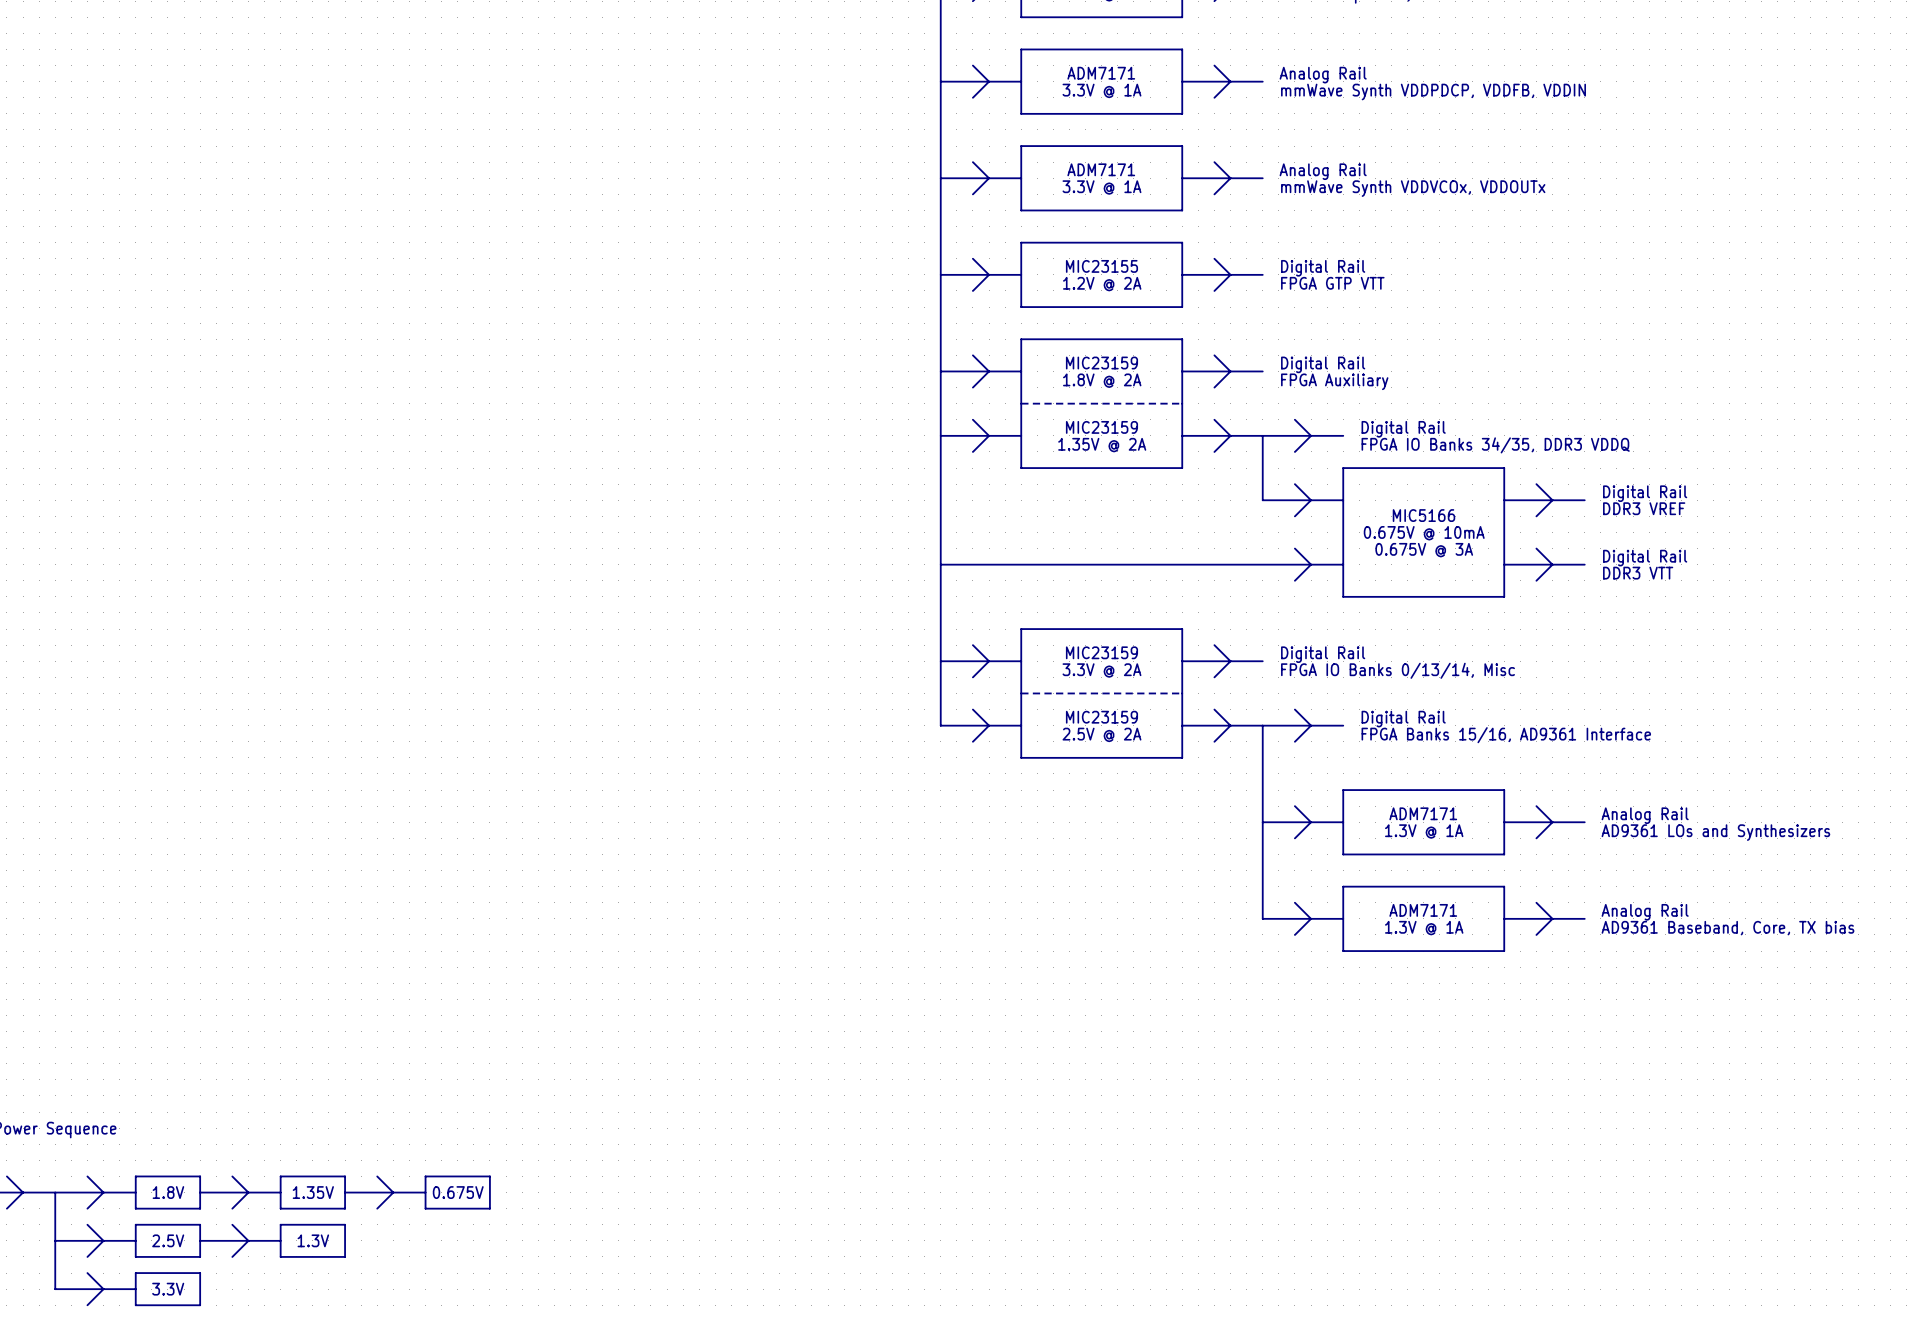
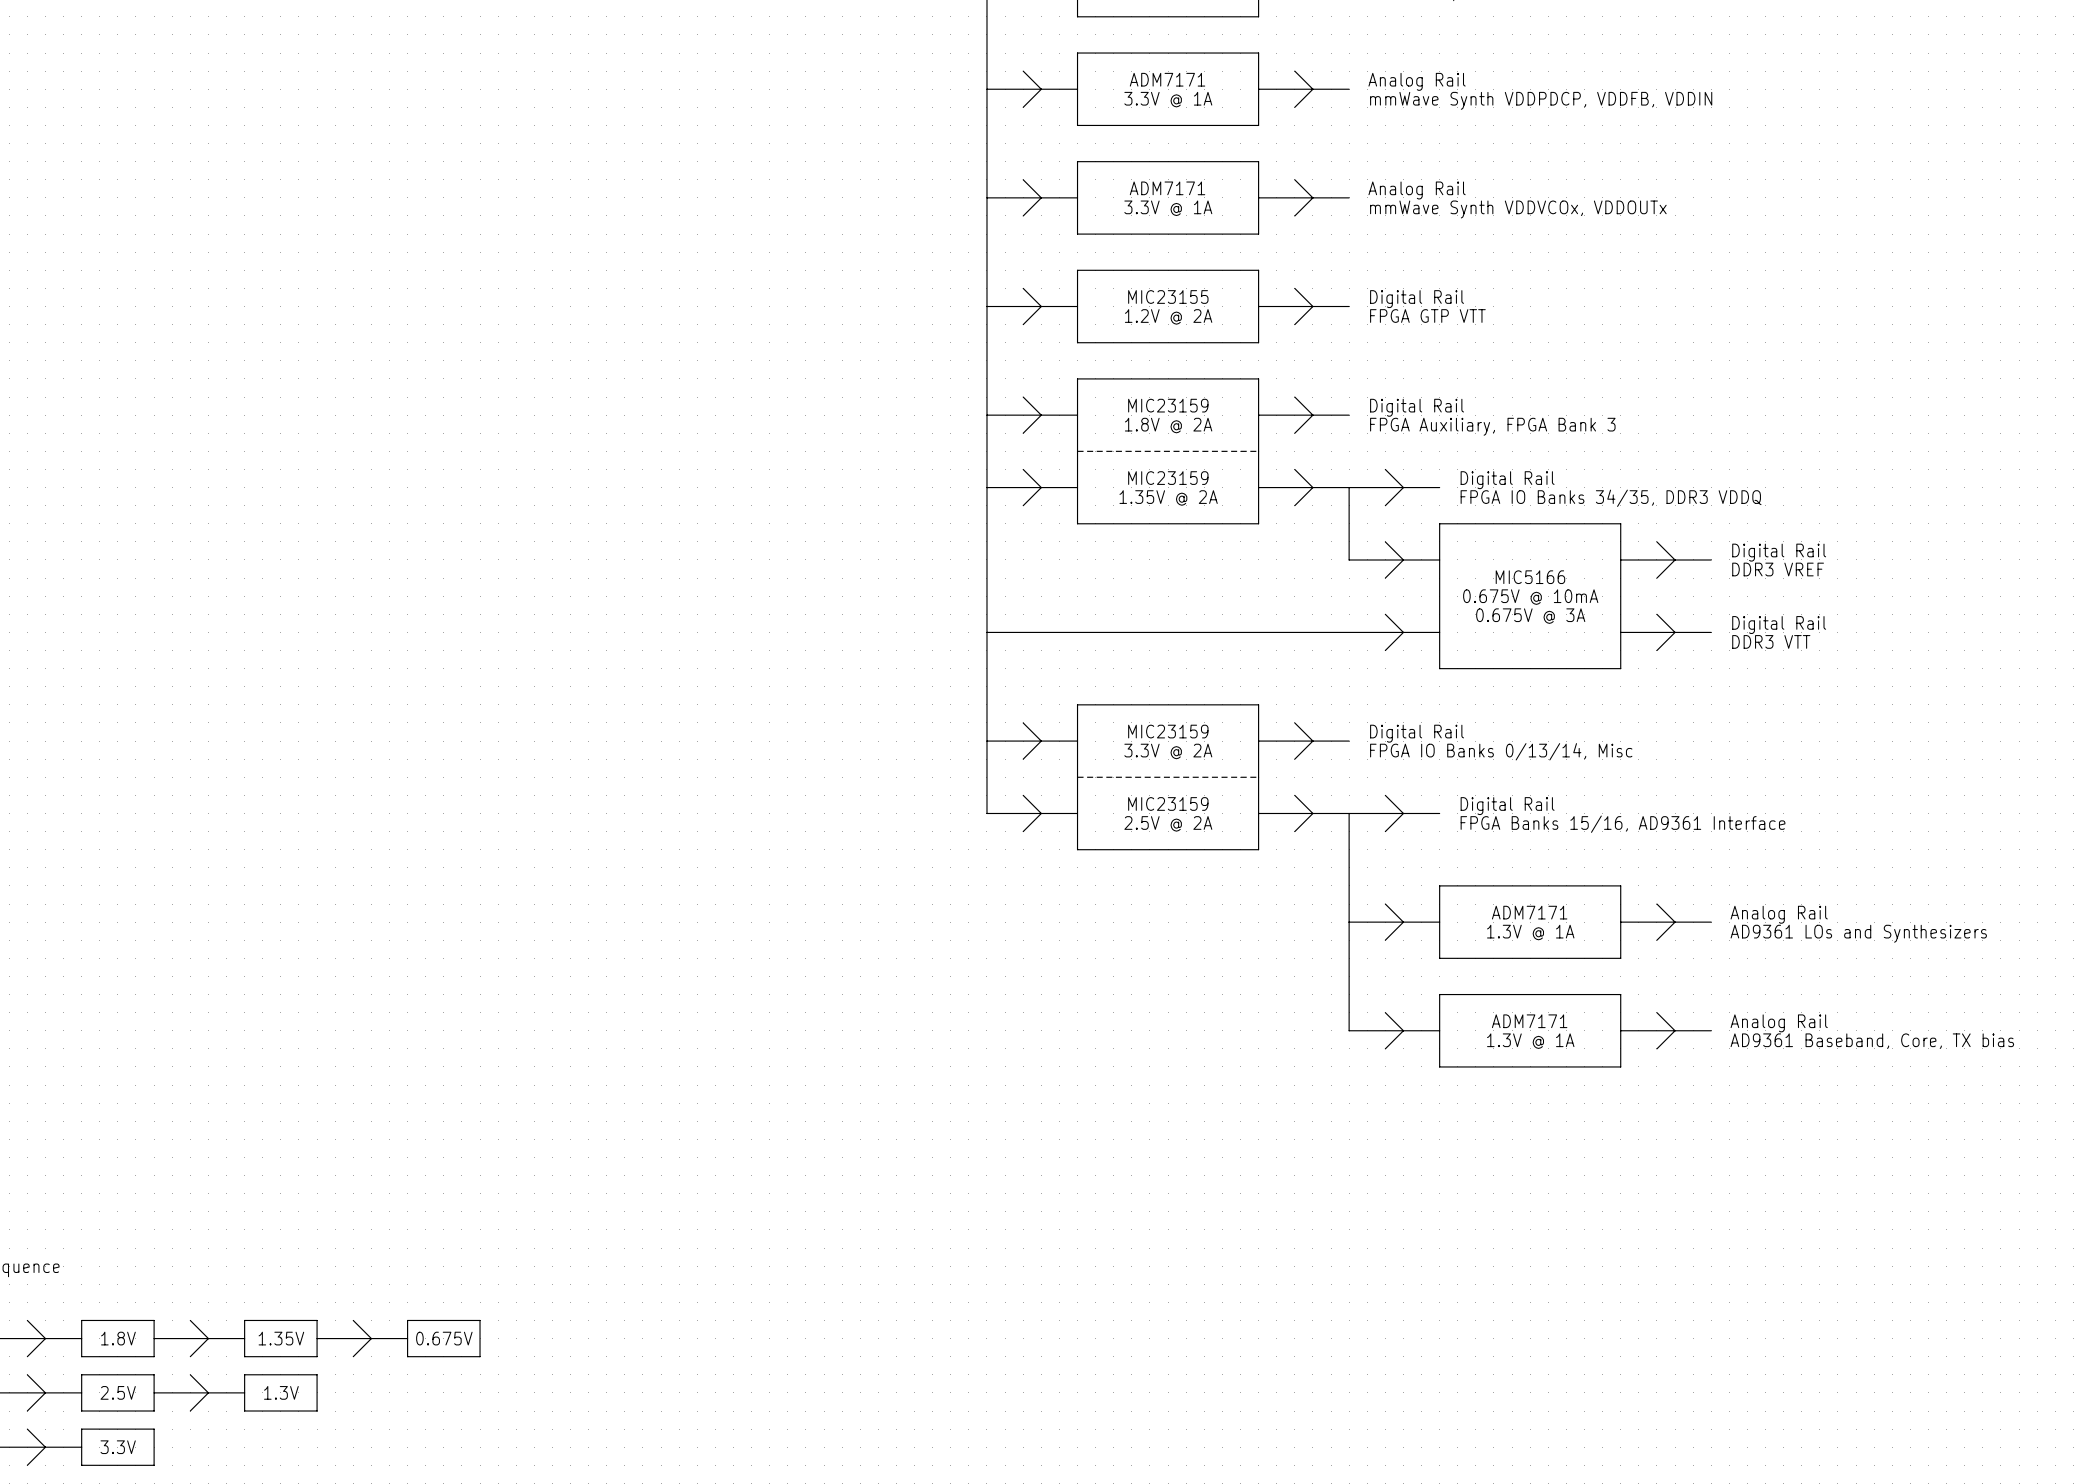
text: FPGA Auxiliary (1334, 381) -> FPGA Auxiliary, FPGA Bank 3 (1492, 426)

